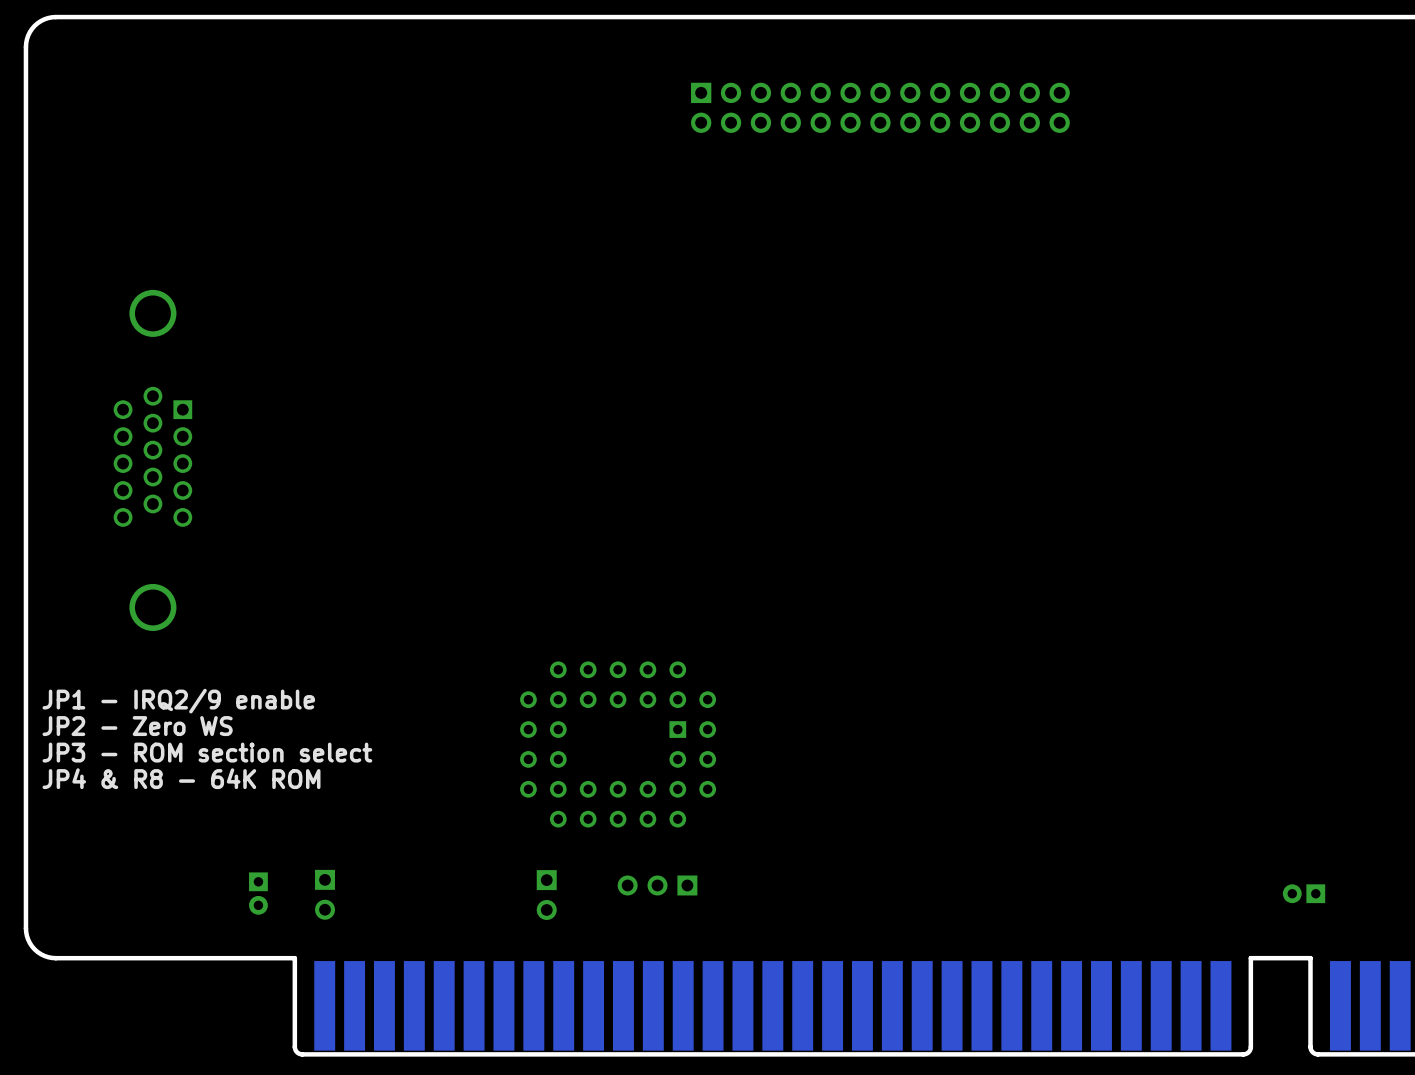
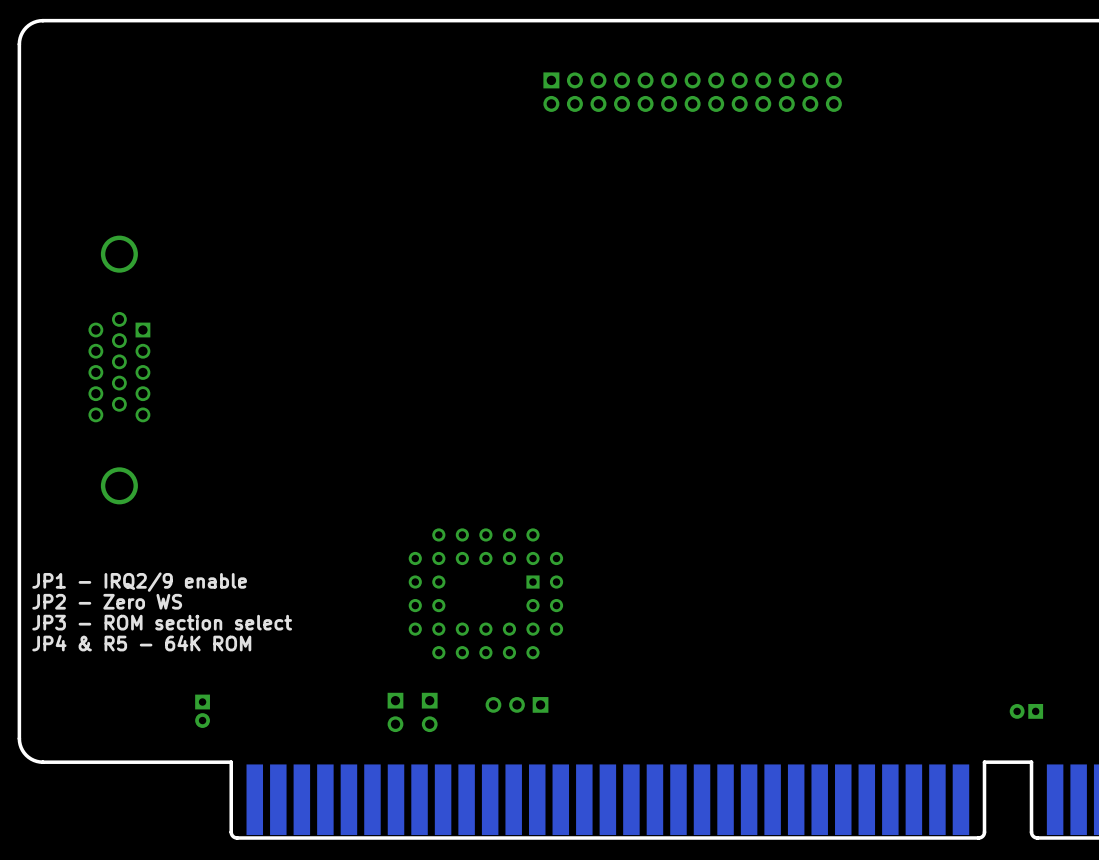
text: JP1 - IRQ2/9 enable (178, 701) -> none
text: JP2 - Zero WS (137, 726) -> JP1 - IRQ2/9 enable (139, 582)
text: JP3 - ROM section select (207, 752) -> JP2 - Zero WS (107, 601)
text: JP4 & R8 - 64K ROM (181, 778) -> JP3 - ROM section select (162, 622)
text: none -> JP4 & R5 - 64K ROM (141, 643)
part position: (325, 894) -> (395, 712)

